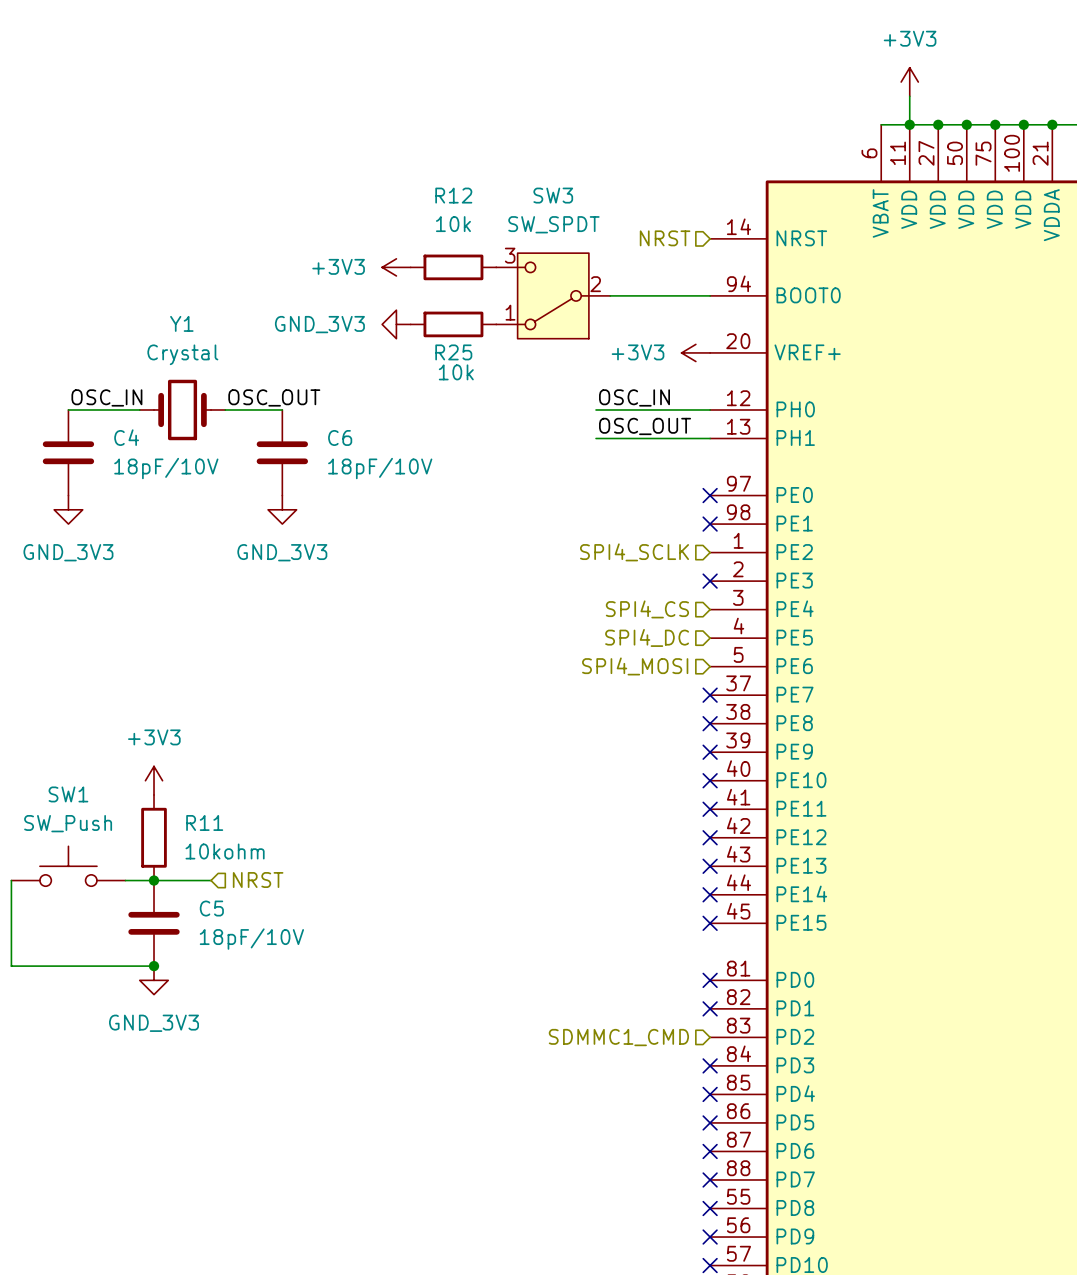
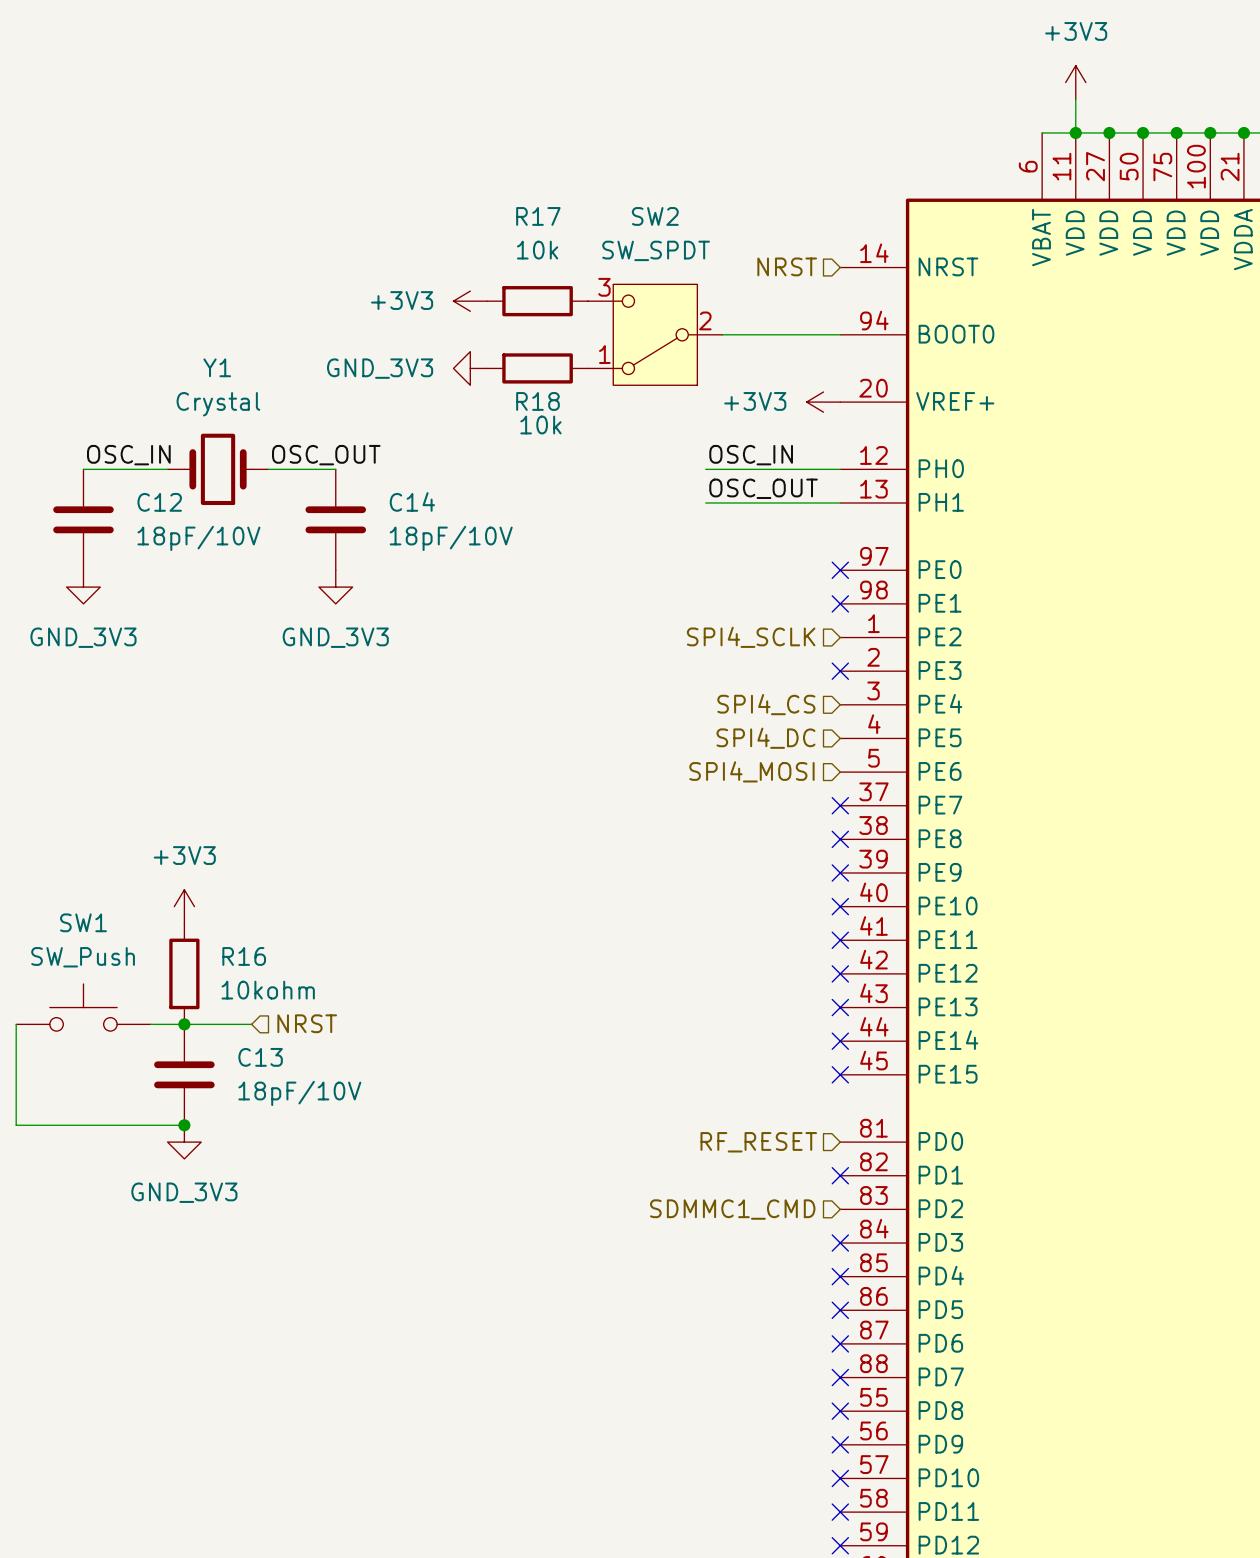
R12 name: R12 (453, 195) -> R17 (538, 216)
SW3 name: SW3 (553, 195) -> SW2 (655, 216)
R25 name: R25 (453, 352) -> R18 (537, 401)
C4 name: C4 (126, 437) -> C12 (159, 502)
C6 name: C6 (340, 437) -> C14 (412, 501)
R11 name: R11 (204, 822) -> R16 (244, 956)
C5 name: C5 (211, 908) -> C13 (260, 1057)
hierarchical label: none -> RF_RESET (758, 1142)
no-connect mark: (710, 980) -> none

